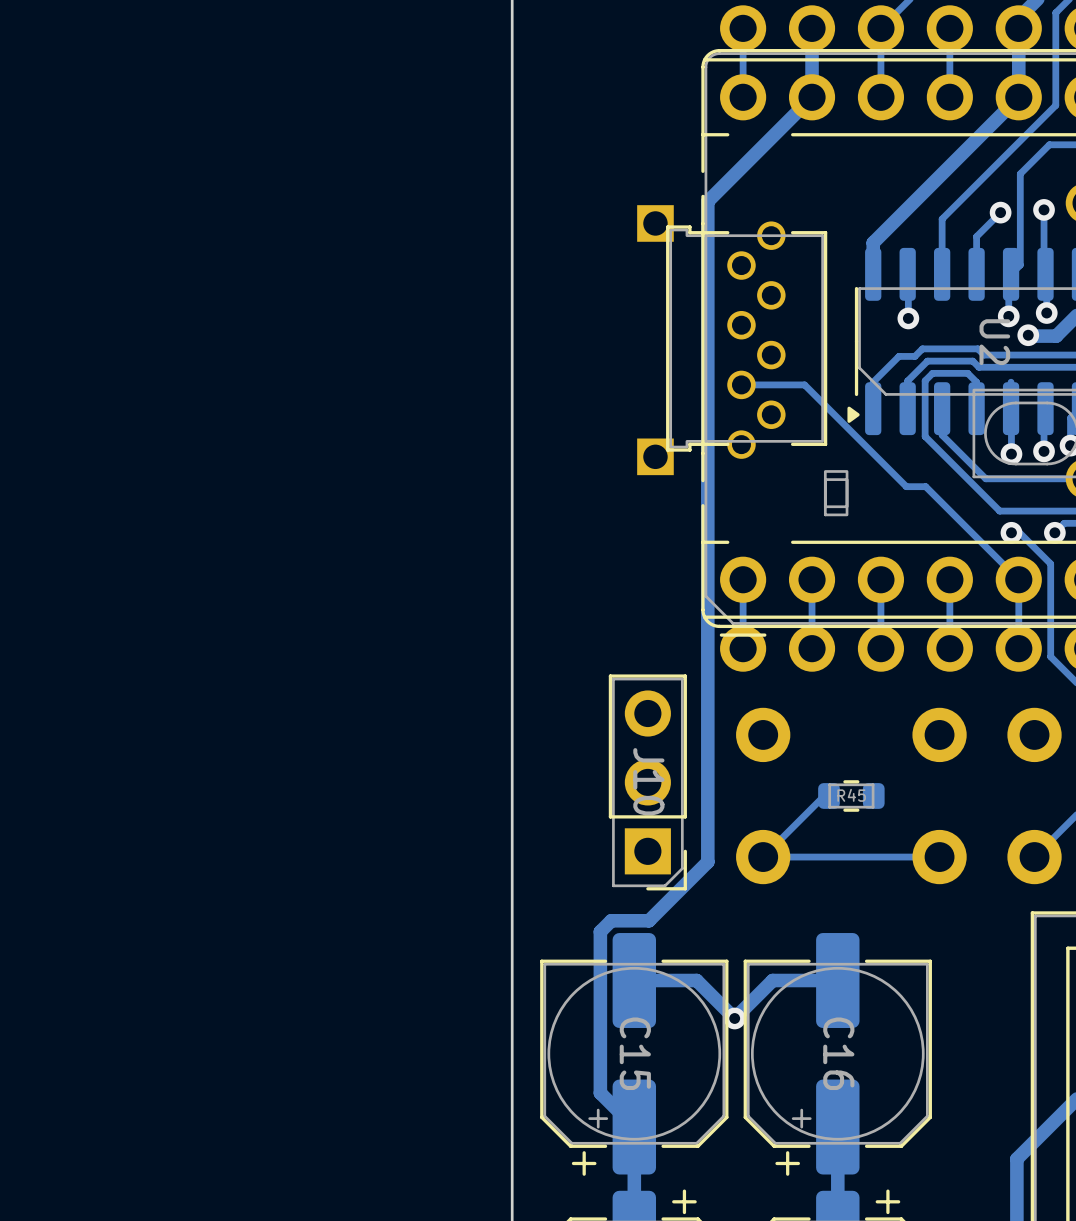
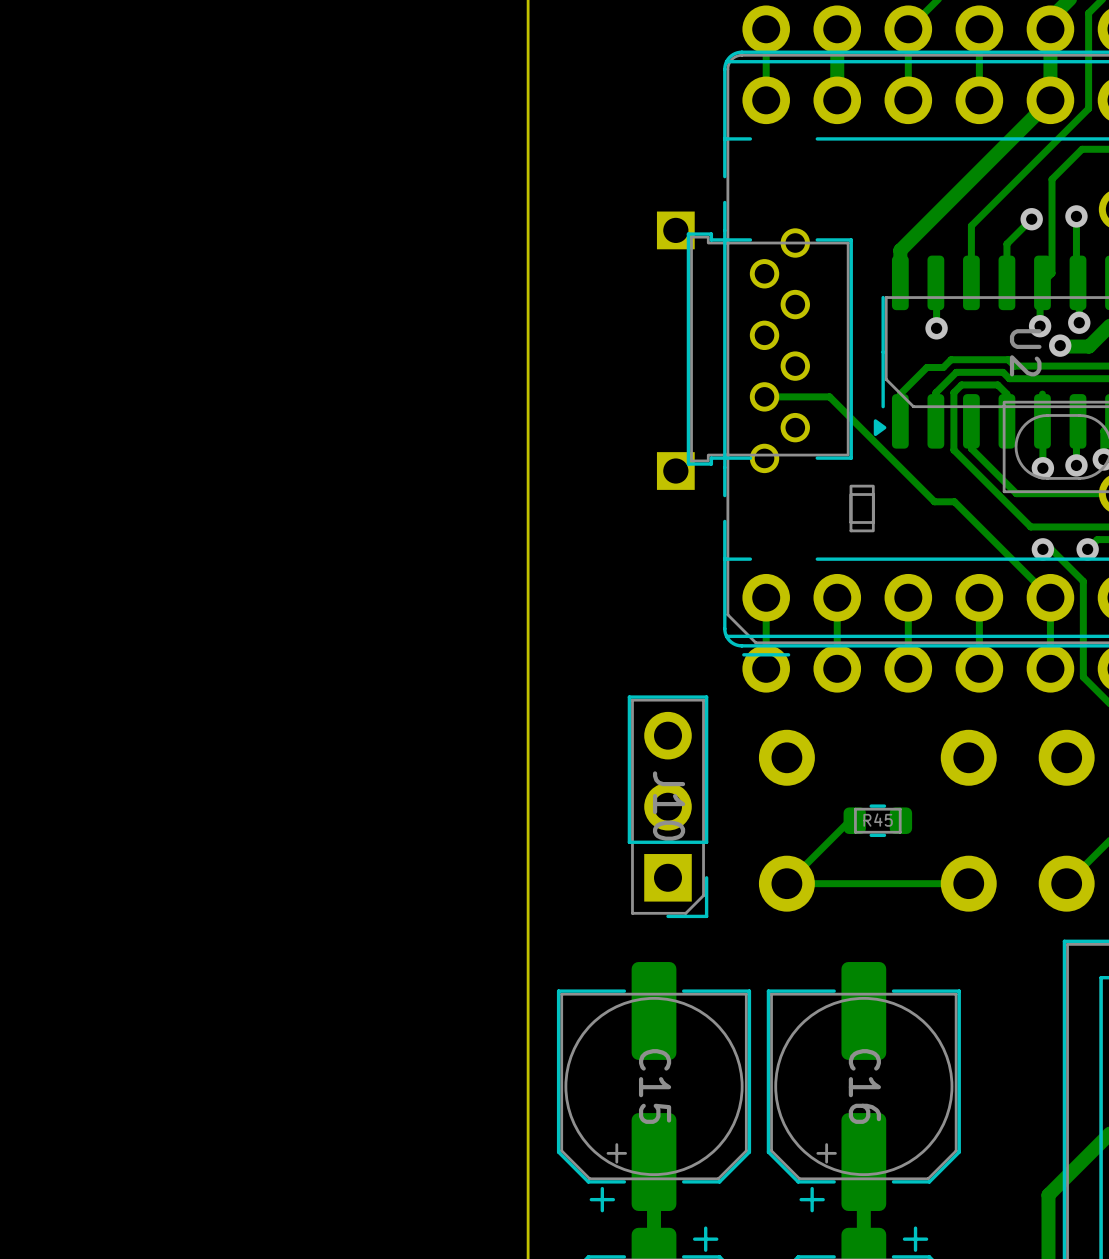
track: (812, 97) (707, 201) (707, 862) (649, 920) (611, 920) (600, 931) (600, 1093) (634, 1127) -> none
track: (837, 980) (772, 980) (734, 1018) (696, 980) (634, 980) -> none
via: (734, 1018) -> none

